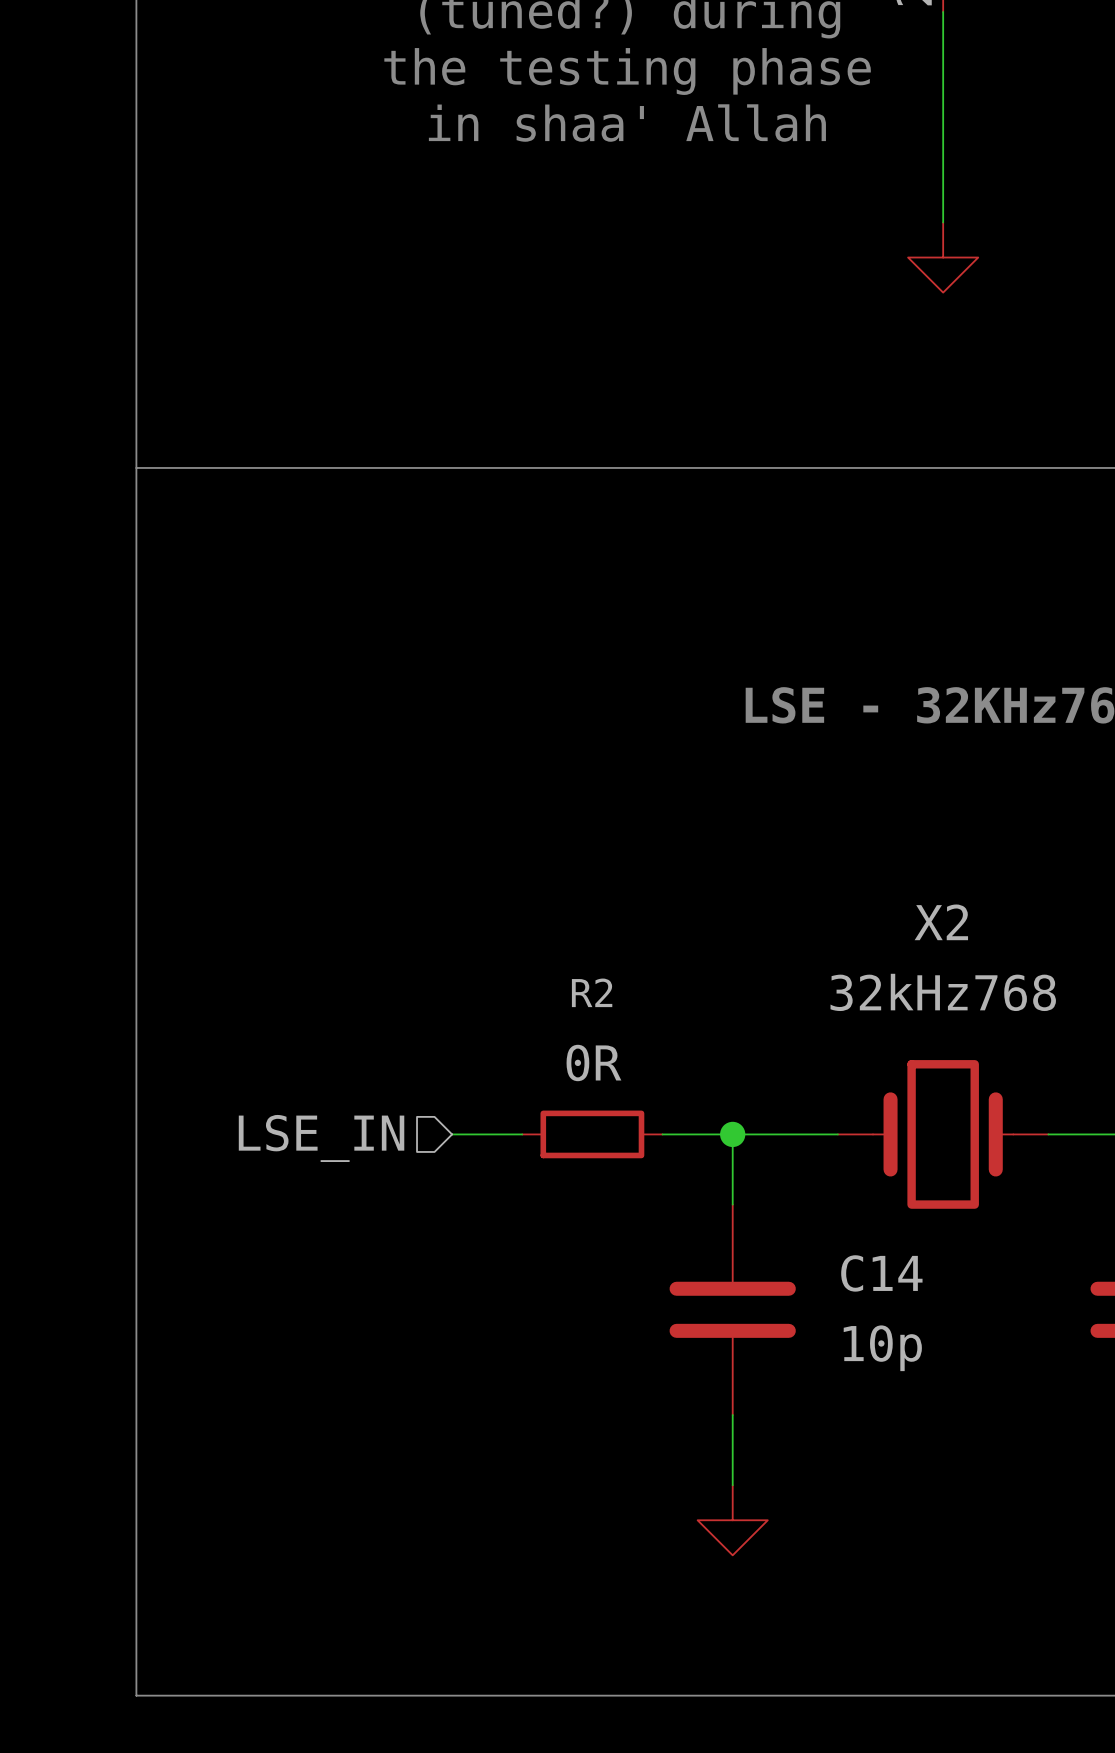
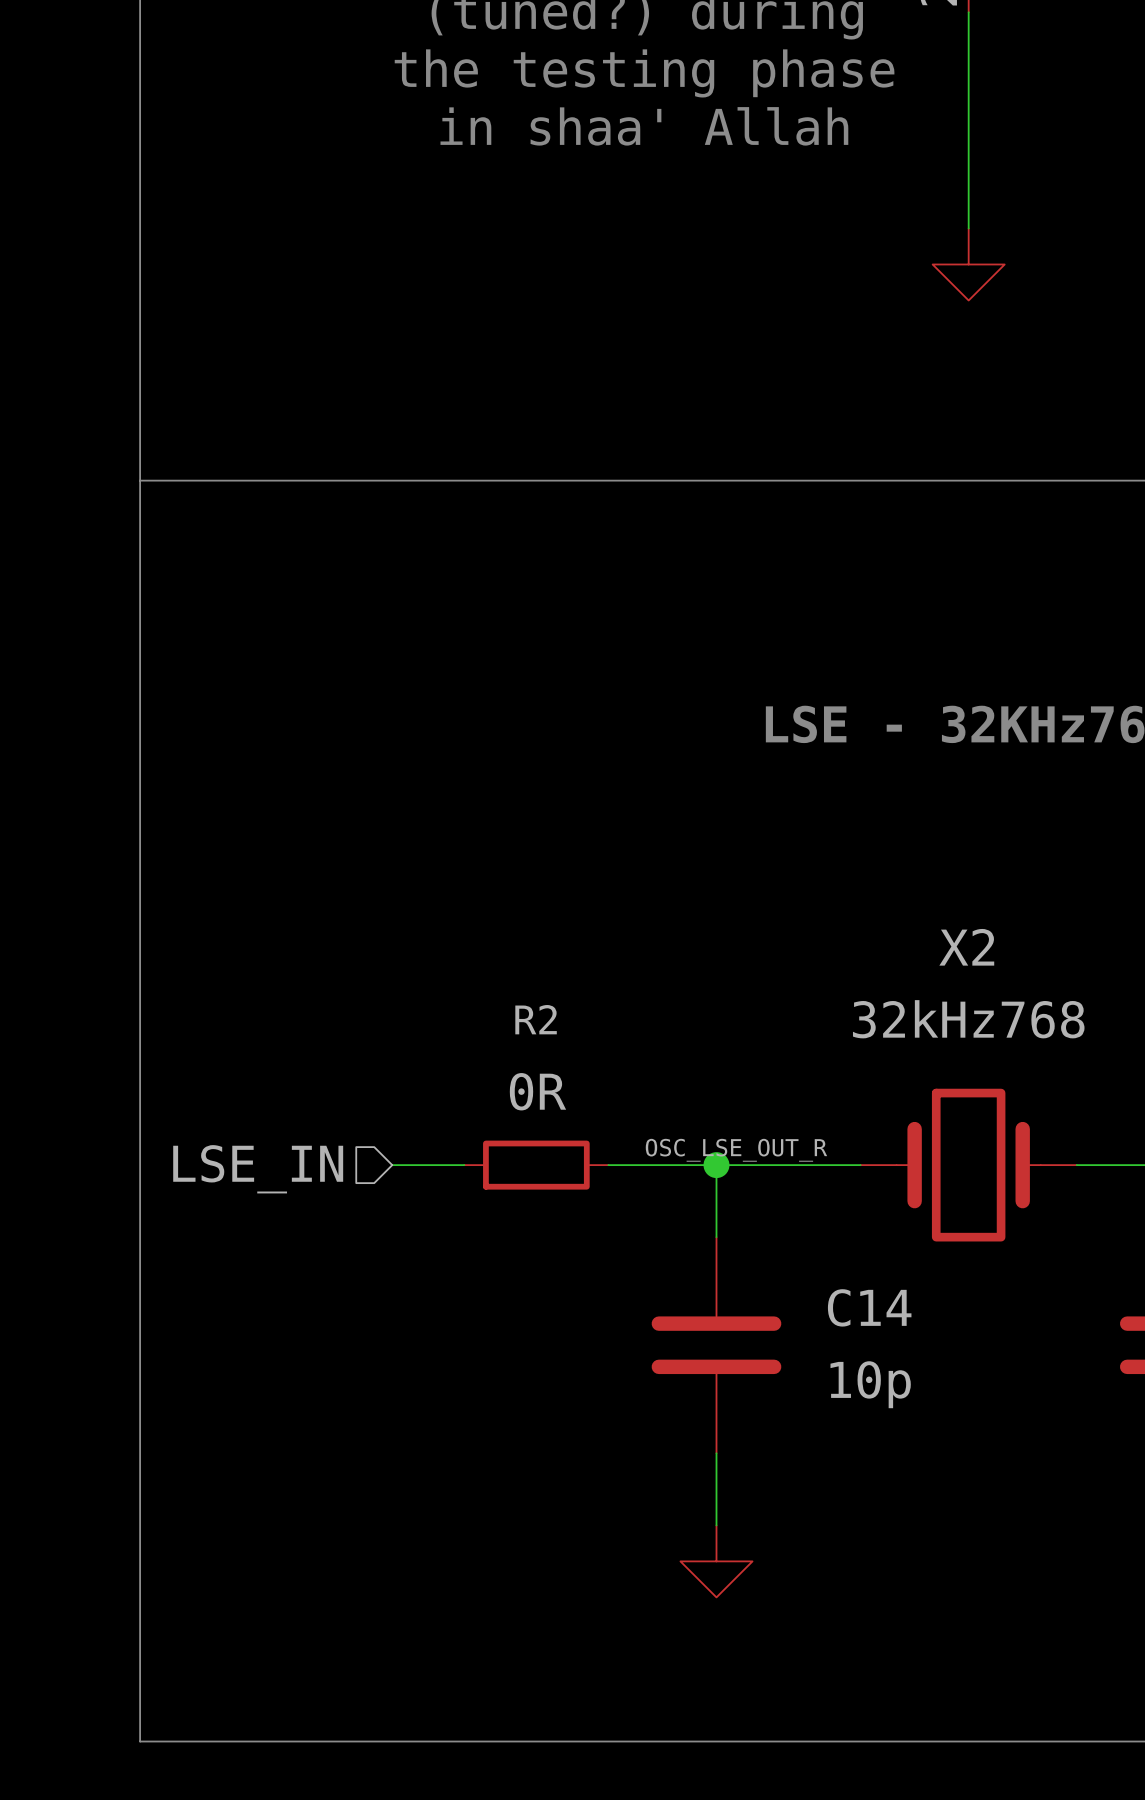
label: none -> OSC_LSE_OUT_R (736, 1150)
wire: (452, 1134) (522, 1134) -> (464, 1165) (392, 1165)
wire: none -> (608, 1165) (680, 1165)
R2 position: (592, 1134) -> (536, 1165)
wire: (732, 1134) (732, 1204) -> (716, 1165) (716, 1237)
junction position: (732, 1134) -> (716, 1165)
hierarchical label position: LSE_IN (321, 1138) -> LSE_IN (258, 1169)
C14 position: (732, 1309) -> (716, 1345)
wire: (732, 1415) (732, 1485) -> (716, 1453) (716, 1525)
power symbol position: (732, 1520) -> (716, 1561)

